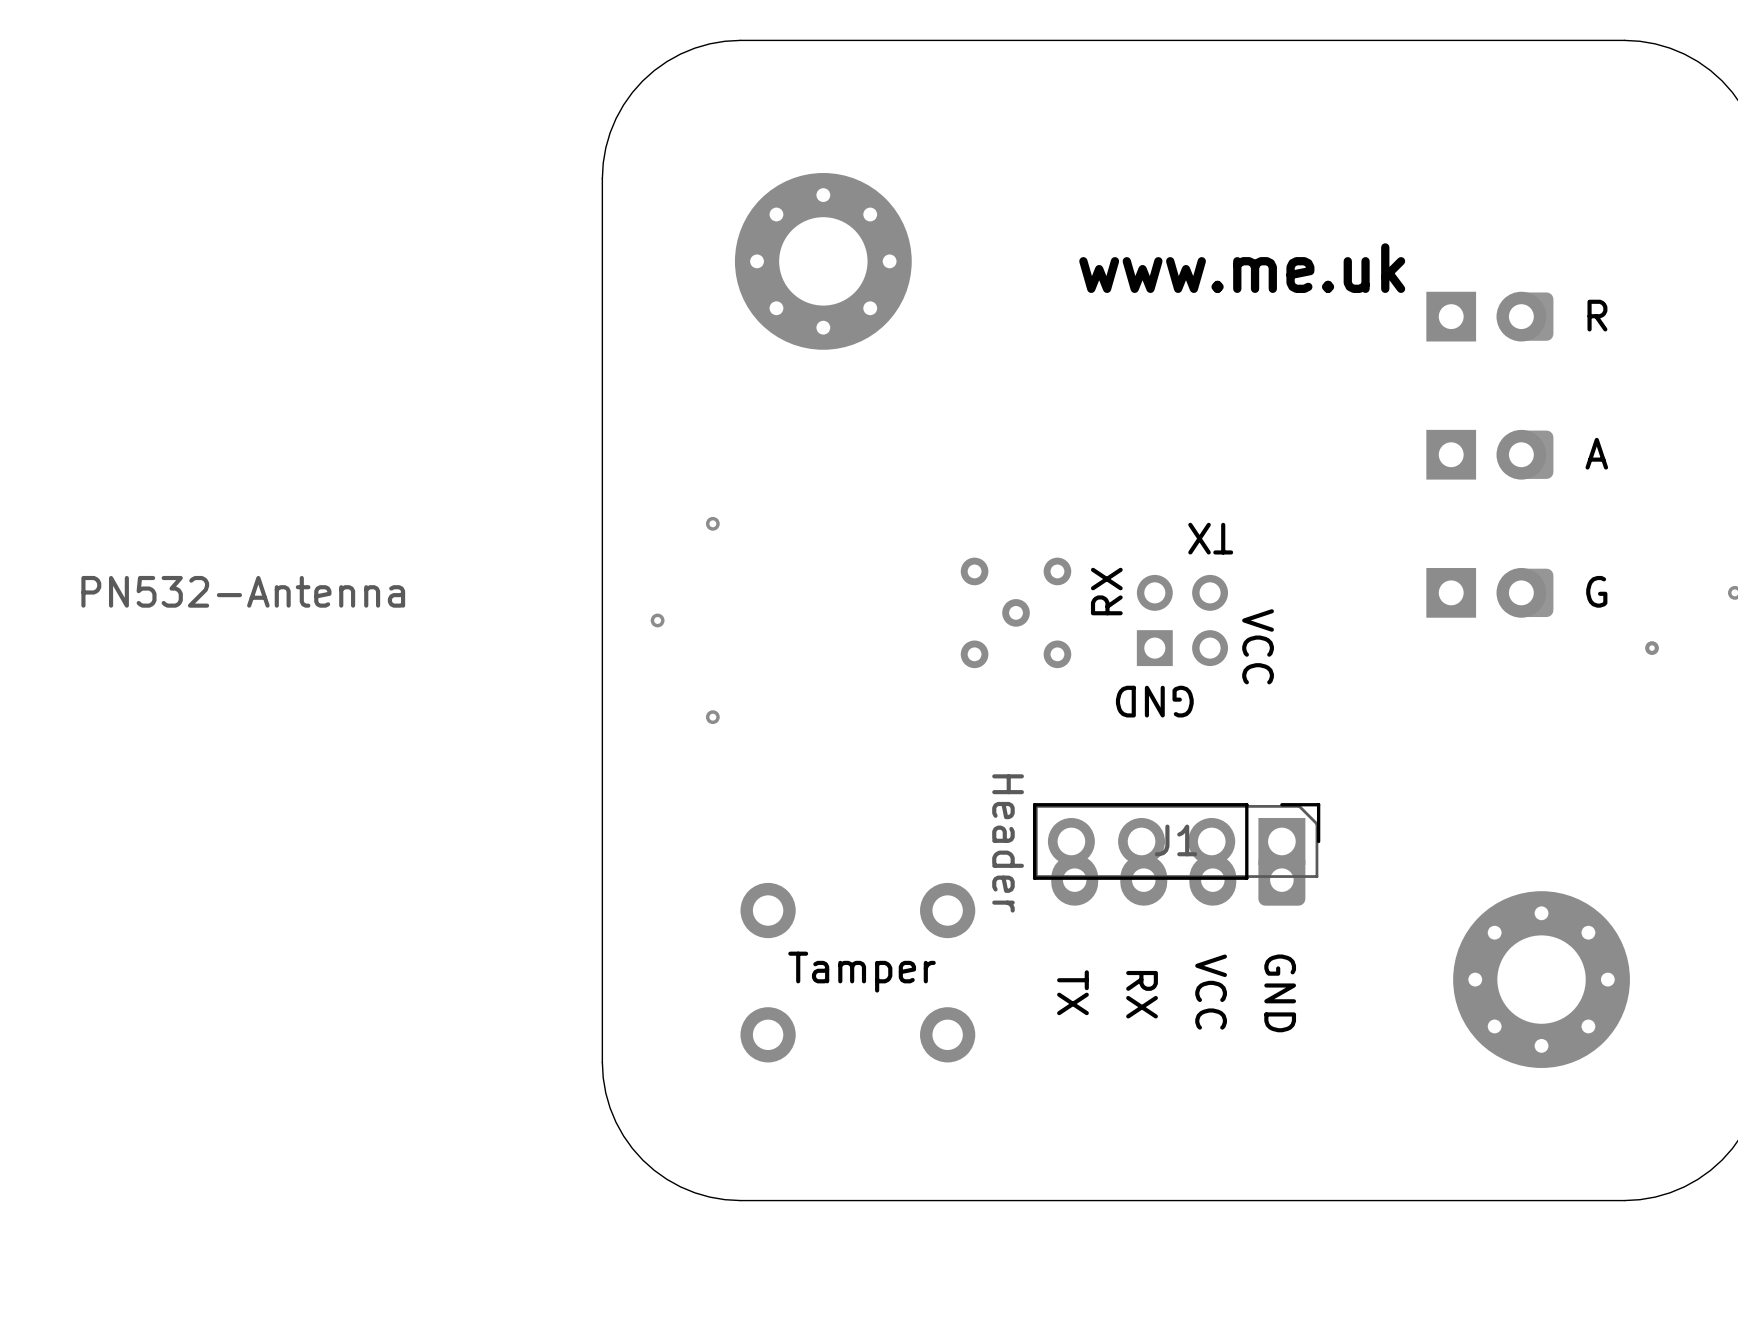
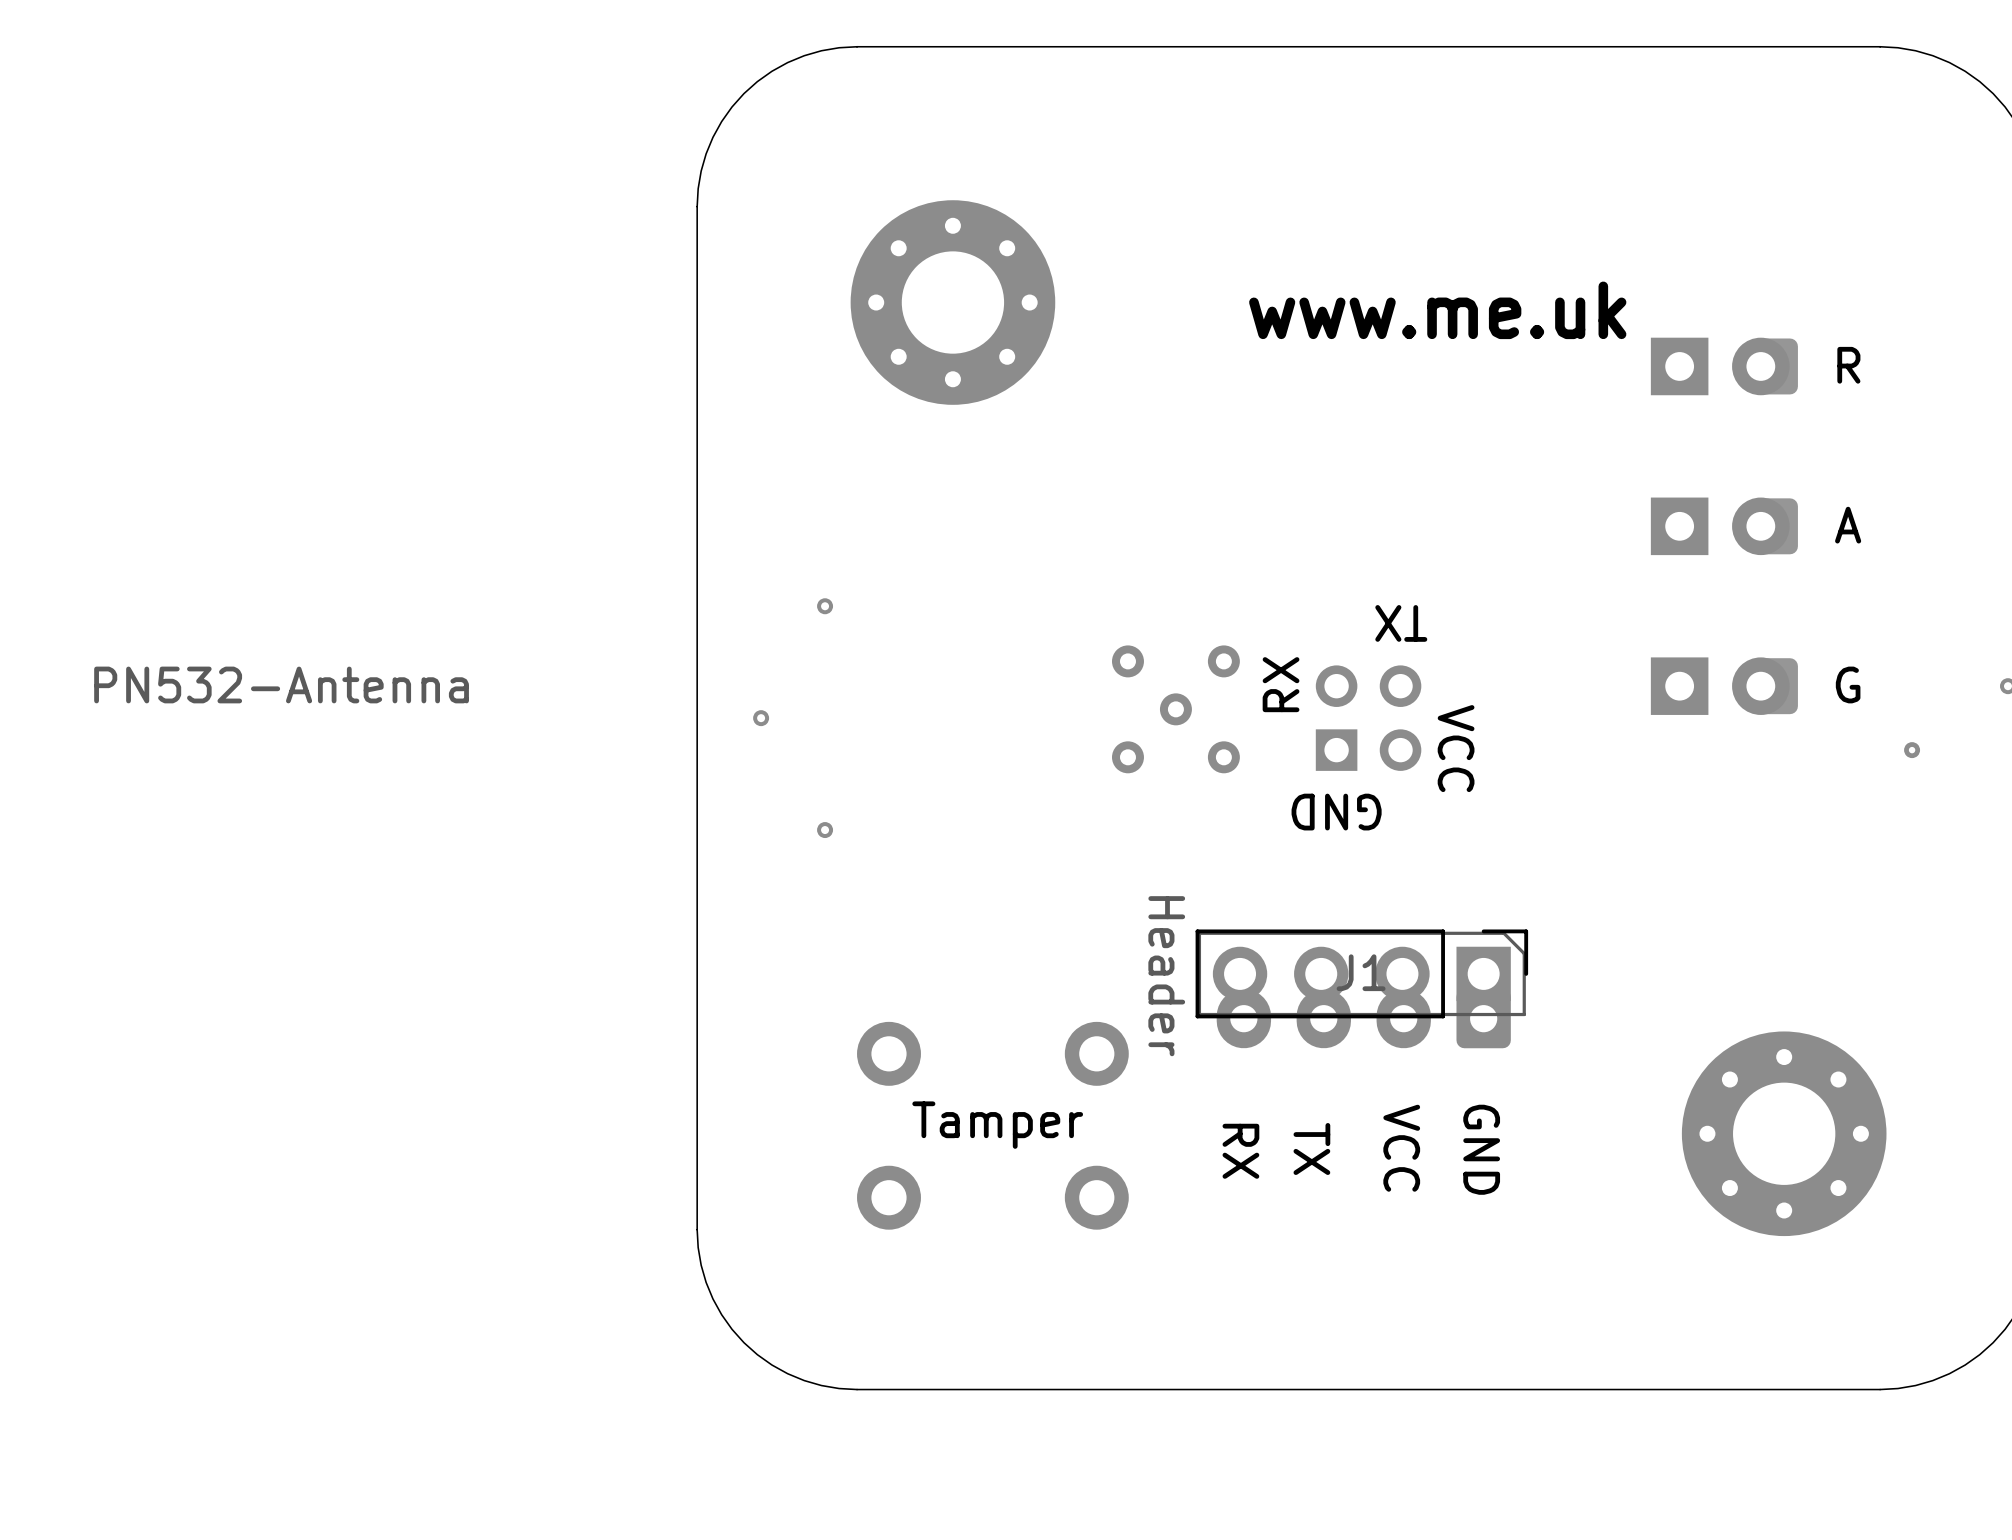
text: TX (1072, 992) -> RX (1240, 1151)
text: RX (1142, 994) -> TX (1311, 1148)

